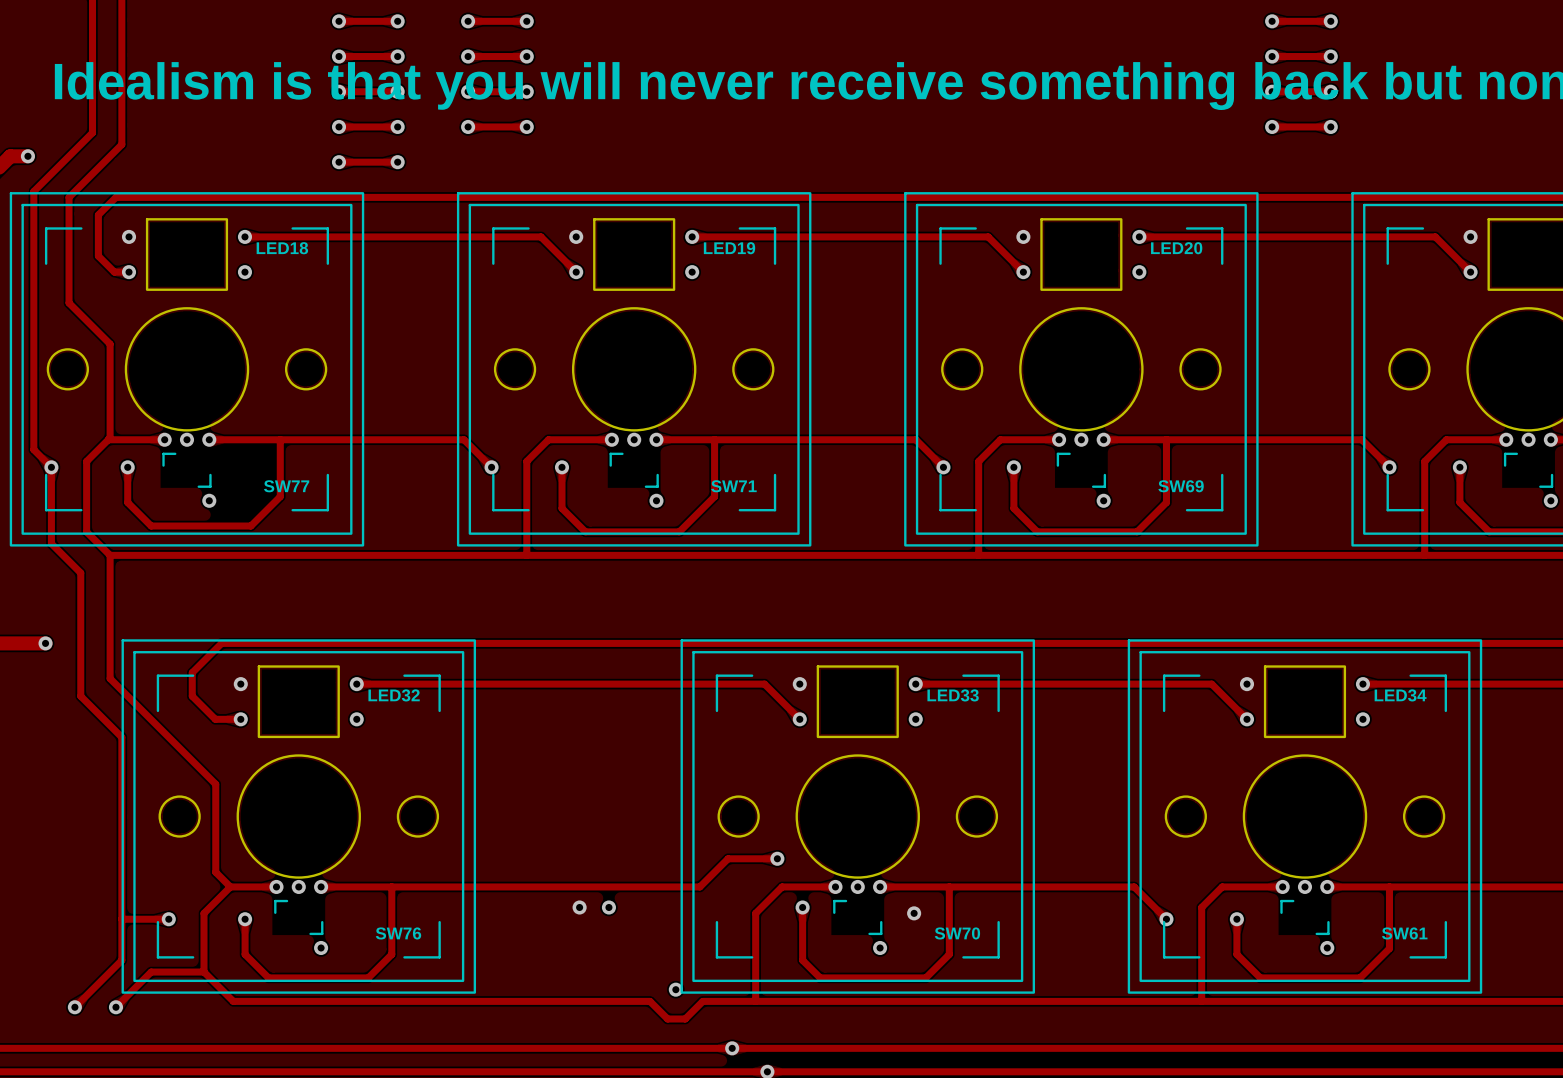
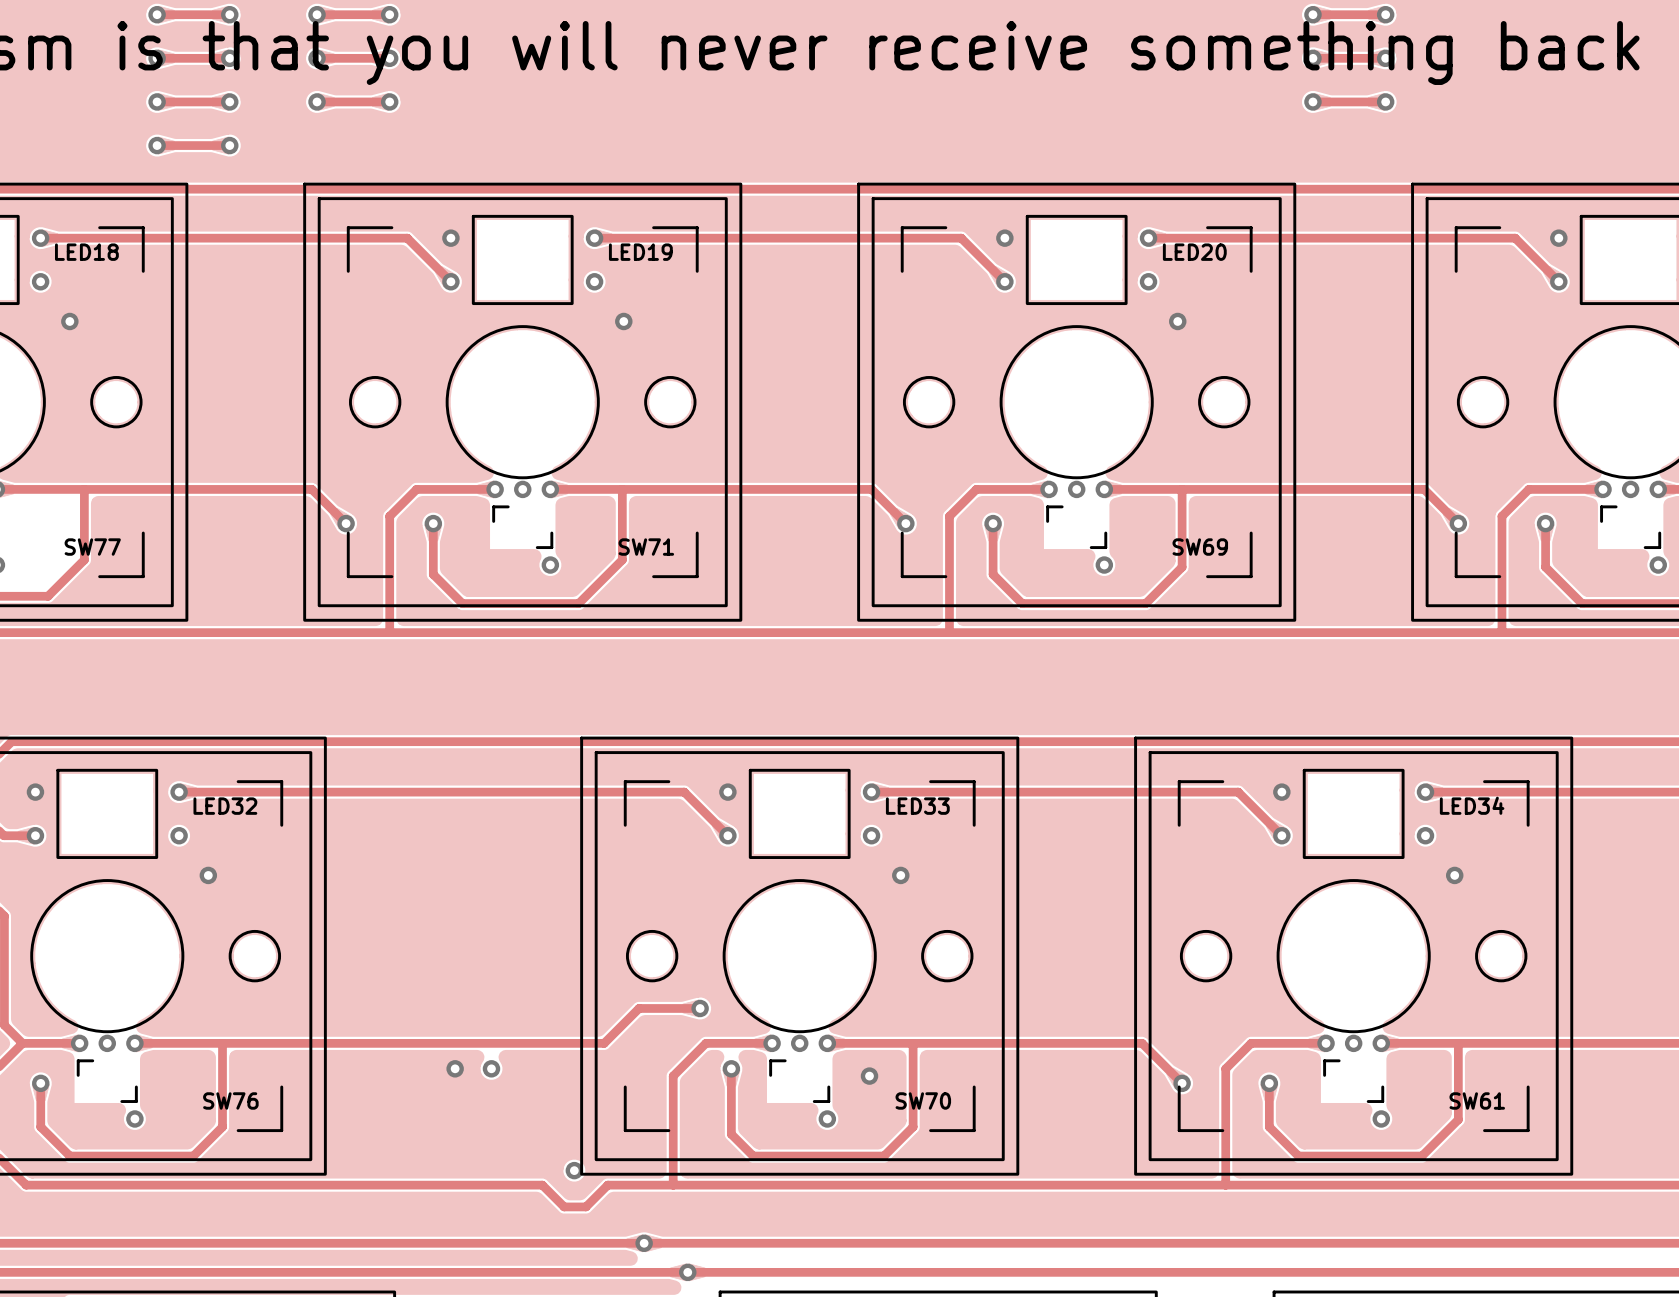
via: none -> (69, 321)
via: none -> (623, 321)
via: none -> (1177, 321)
via: none -> (208, 875)
via: none -> (900, 875)
via: none -> (1454, 875)

